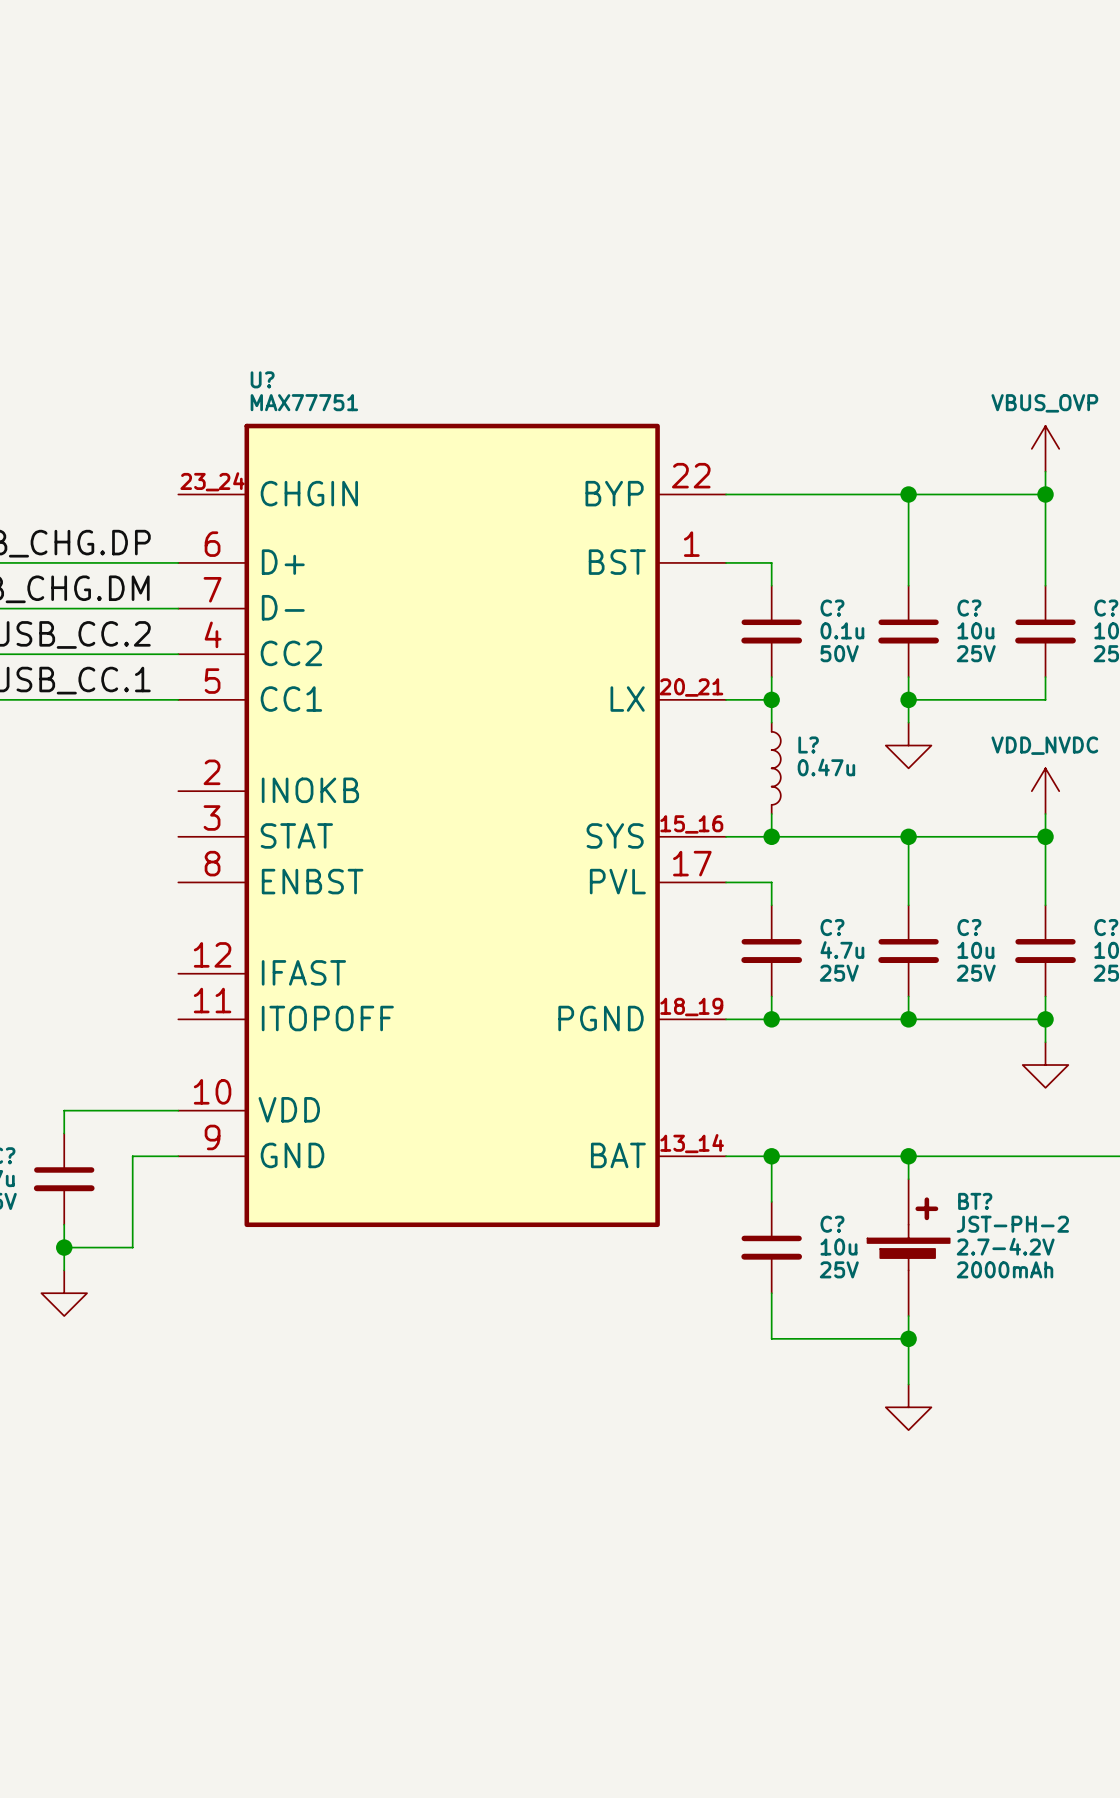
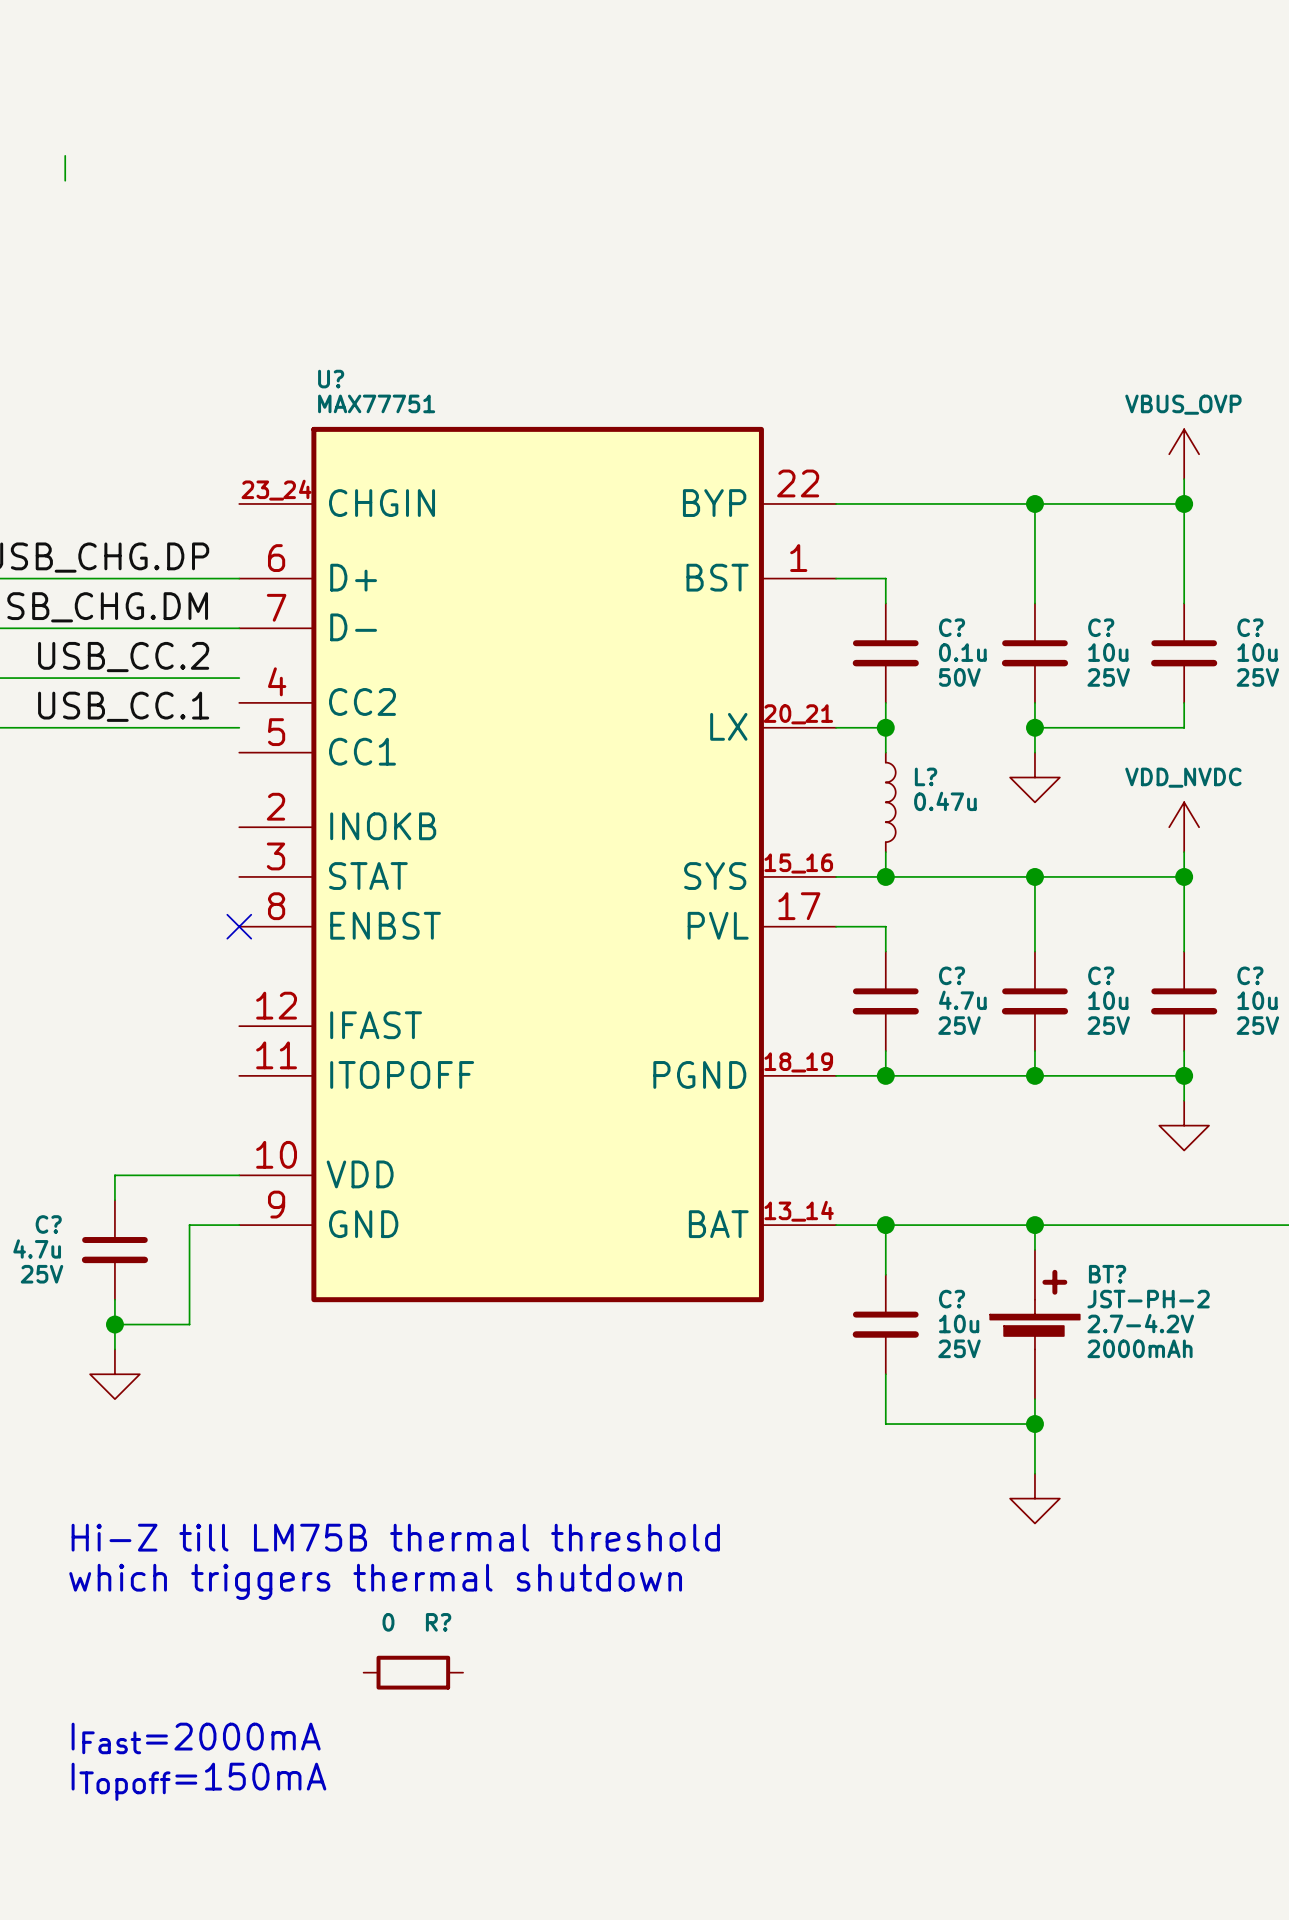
wire: none -> (65, 155) (65, 180)
U? symbol: [178, 423, 727, 1228] -> [239, 426, 837, 1303]
no-connect mark: none -> (239, 926)
text: none -> Hi-Z till LM75B thermal threshold (395, 1537)
text: none -> which triggers thermal shutdown (375, 1581)
R?: none -> 0 (413, 1672)
text: none -> IFast=2000mA (196, 1738)
text: none -> ITopoff=150mA (198, 1781)

